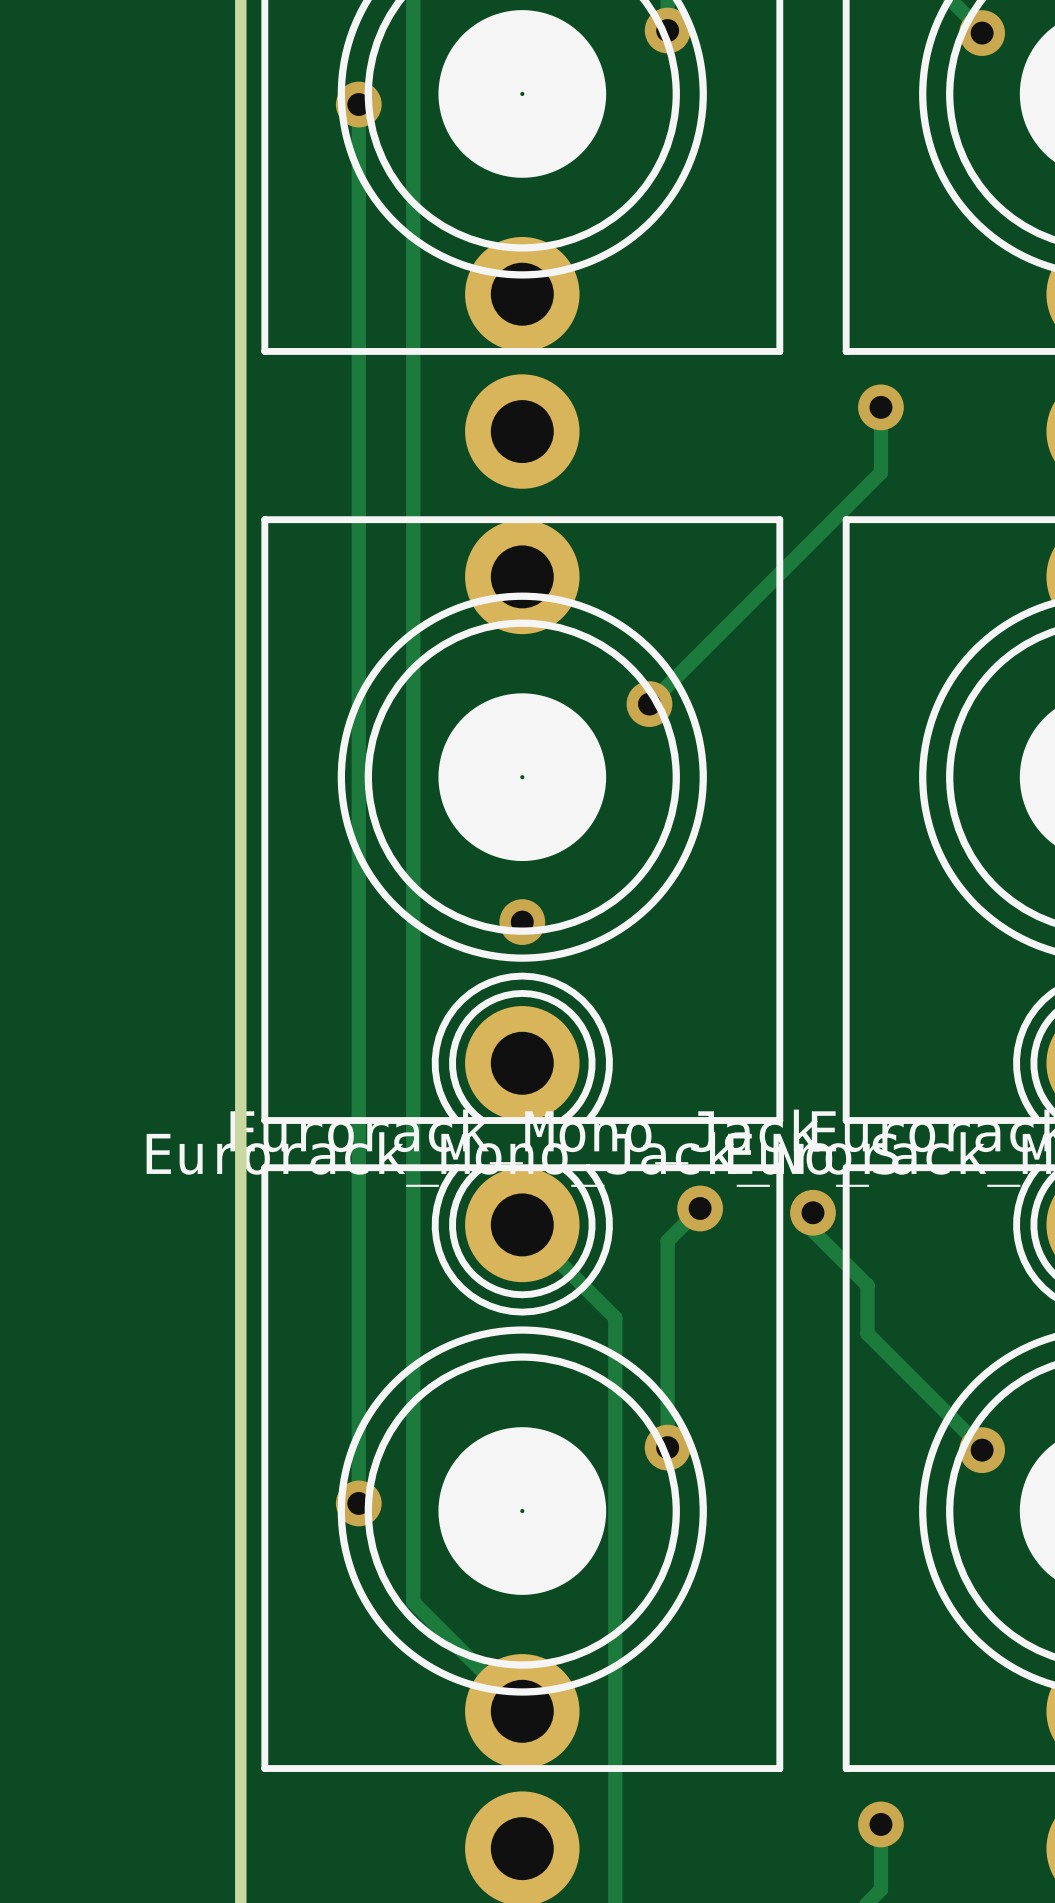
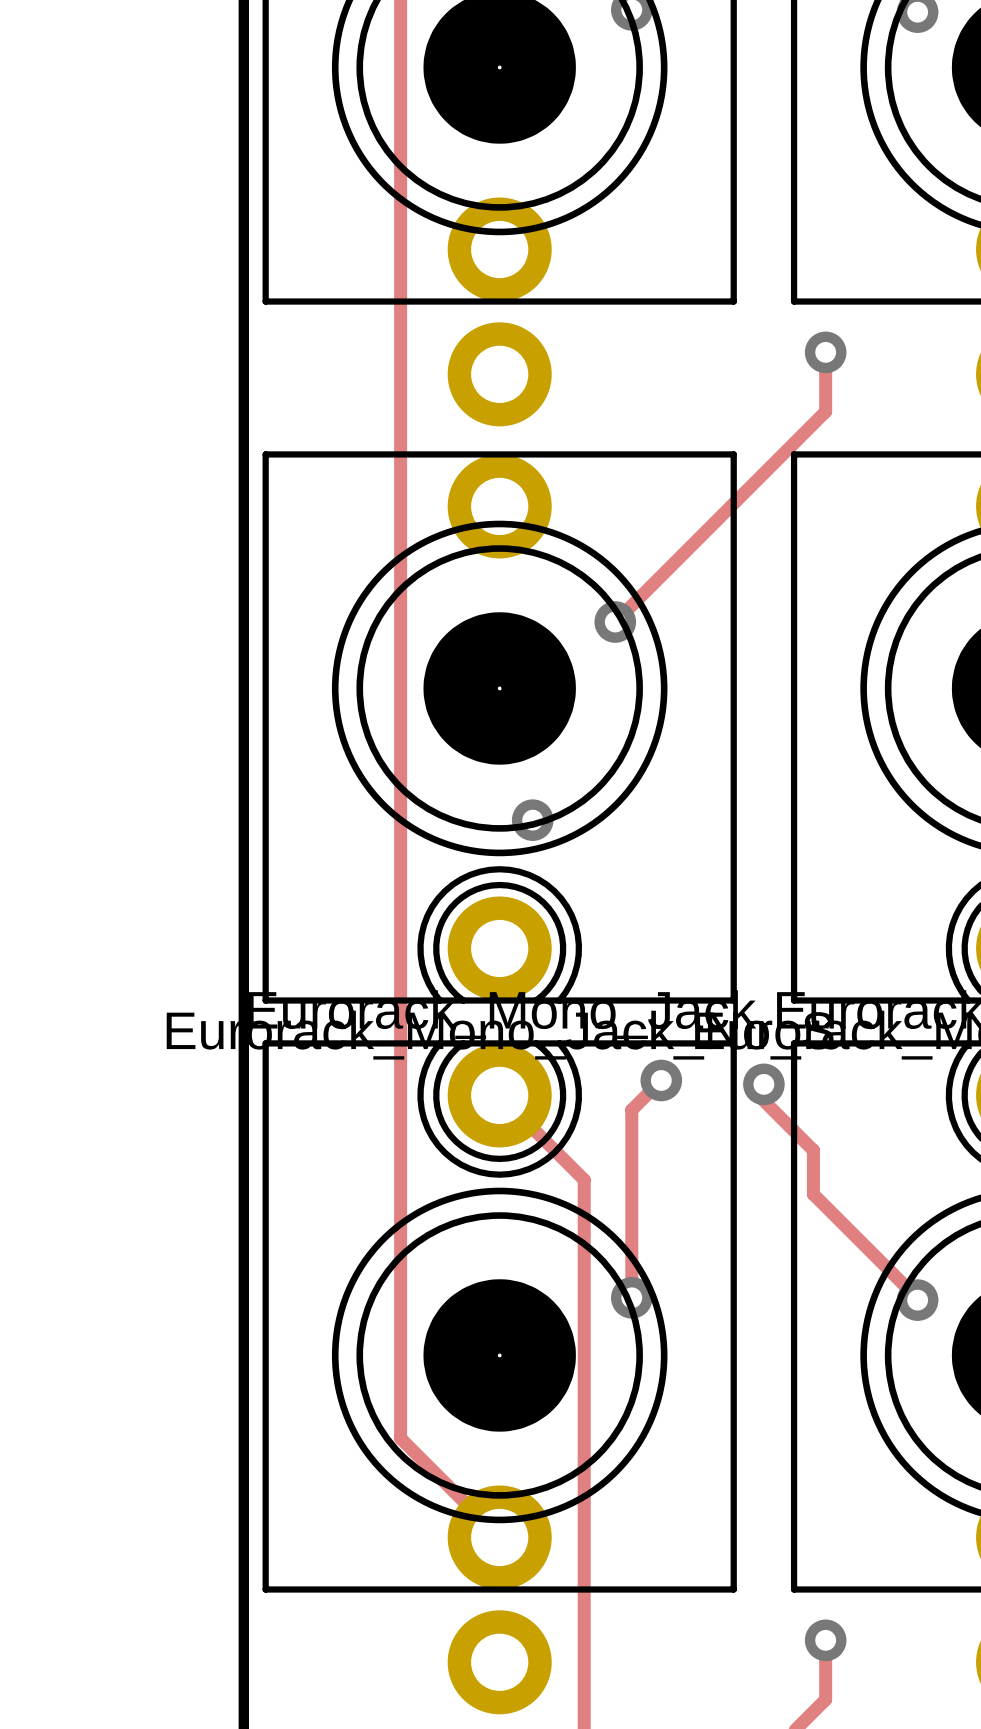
track: (358, 104) (358, 1503) -> none
via: (358, 104) -> none
via position: (522, 922) -> (532, 820)
via: (358, 1503) -> none

